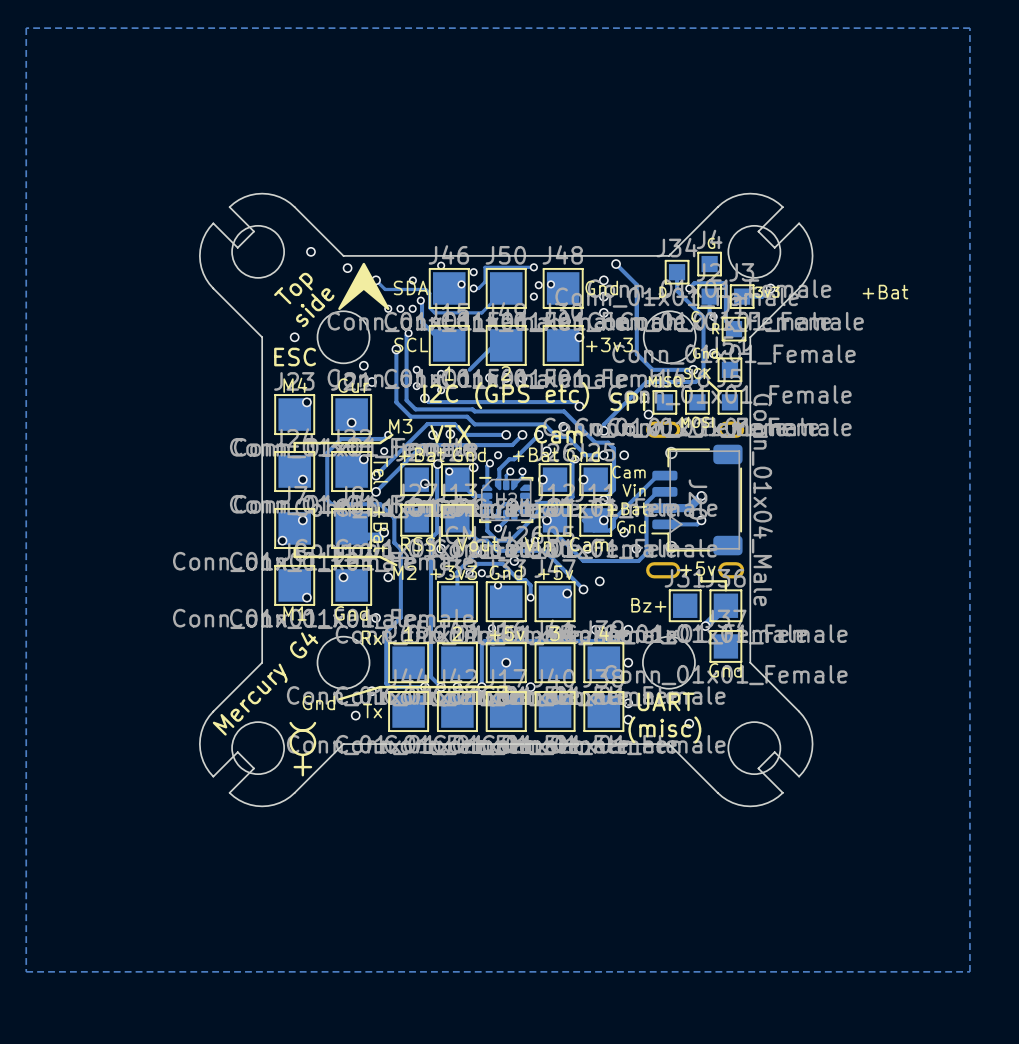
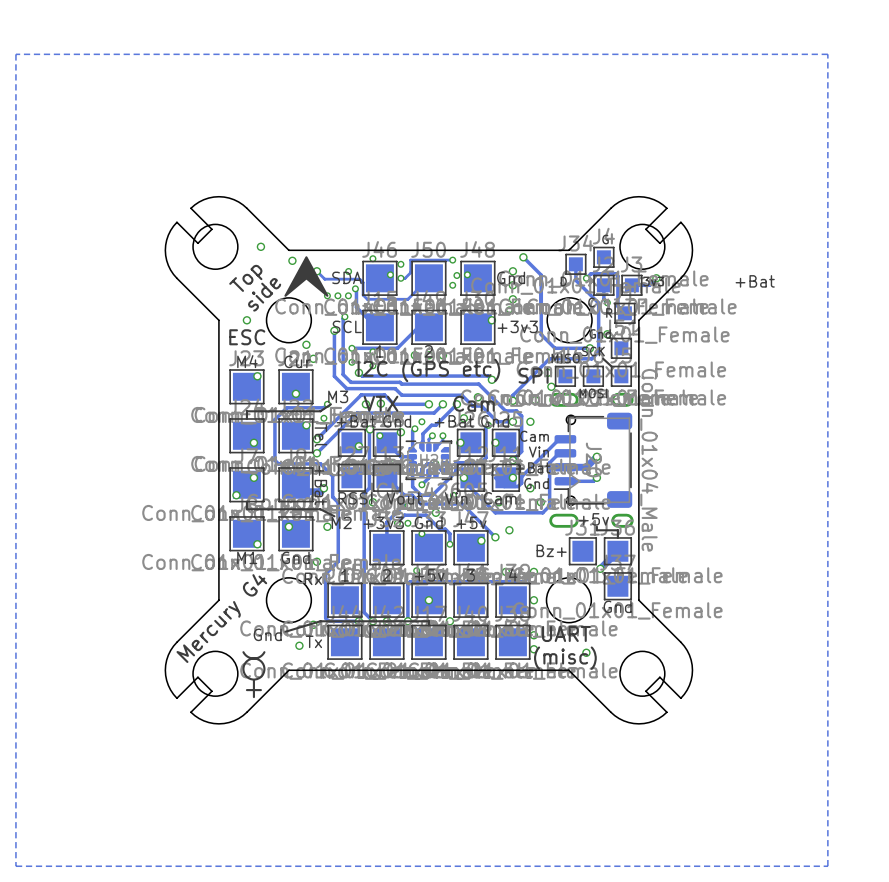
track: none -> (397, 348) (351, 348)

